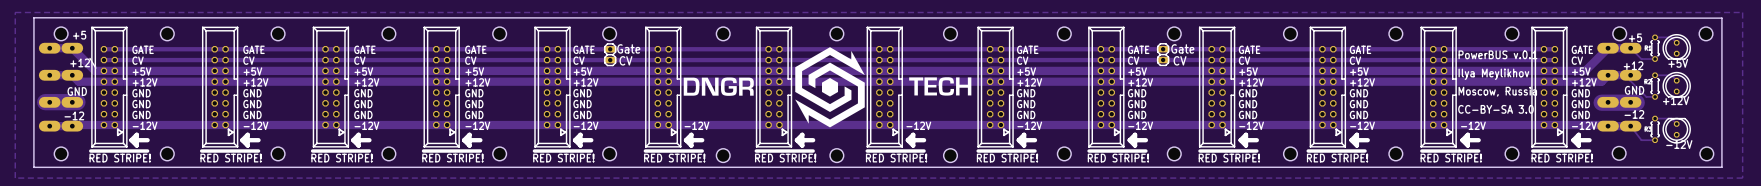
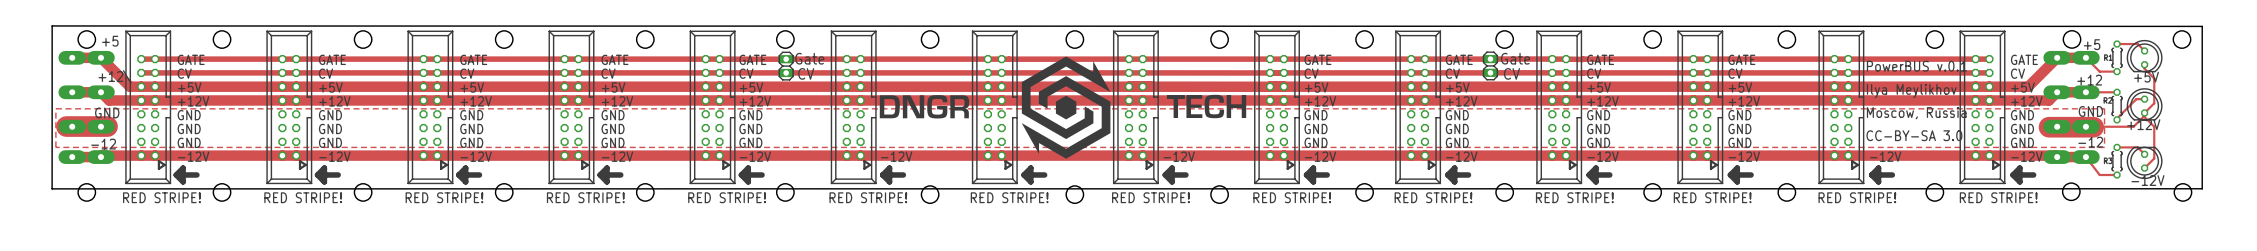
zone outline: (15, 12) (1742, 12) (1742, 178) (15, 178) (15, 12) -> none
board edge: (1721, 23) (1721, 18) (33, 17) (33, 167) (1721, 167) (1721, 151) -> (2202, 26) (52, 25) (52, 188) (2202, 188)
track: none -> (2144, 64) (2144, 68) (2154, 78) (2154, 103) (2144, 112) (2144, 117)
track: (1630, 75) (1630, 80) (1646, 96) (1655, 96) -> none
track: none -> (2089, 92) (2115, 92)
track: (1655, 75) (1671, 75) (1676, 80) -> (2115, 119) (2136, 99) (2144, 99)
zone outline: none -> (55, 108) (2104, 108) (2104, 147) (55, 147) (55, 108)
track: none -> (2144, 117) (2154, 126) (2154, 158) (2144, 168)
track: none -> (2144, 117) (2133, 126) (2085, 126)
line: (90, 151) (147, 151) -> none
line: (201, 151) (258, 151) -> none
line: (312, 151) (369, 151) -> none
line: (423, 151) (480, 151) -> none
line: (534, 151) (591, 151) -> none
line: (645, 151) (702, 151) -> none
line: (756, 151) (813, 151) -> none
line: (867, 151) (924, 151) -> none
line: (978, 151) (1034, 151) -> none
line: (1089, 151) (1145, 151) -> none
line: (1200, 151) (1256, 151) -> none
line: (1308, 151) (1365, 151) -> none
line: (1421, 151) (1478, 151) -> none
line: (1532, 151) (1589, 151) -> none

